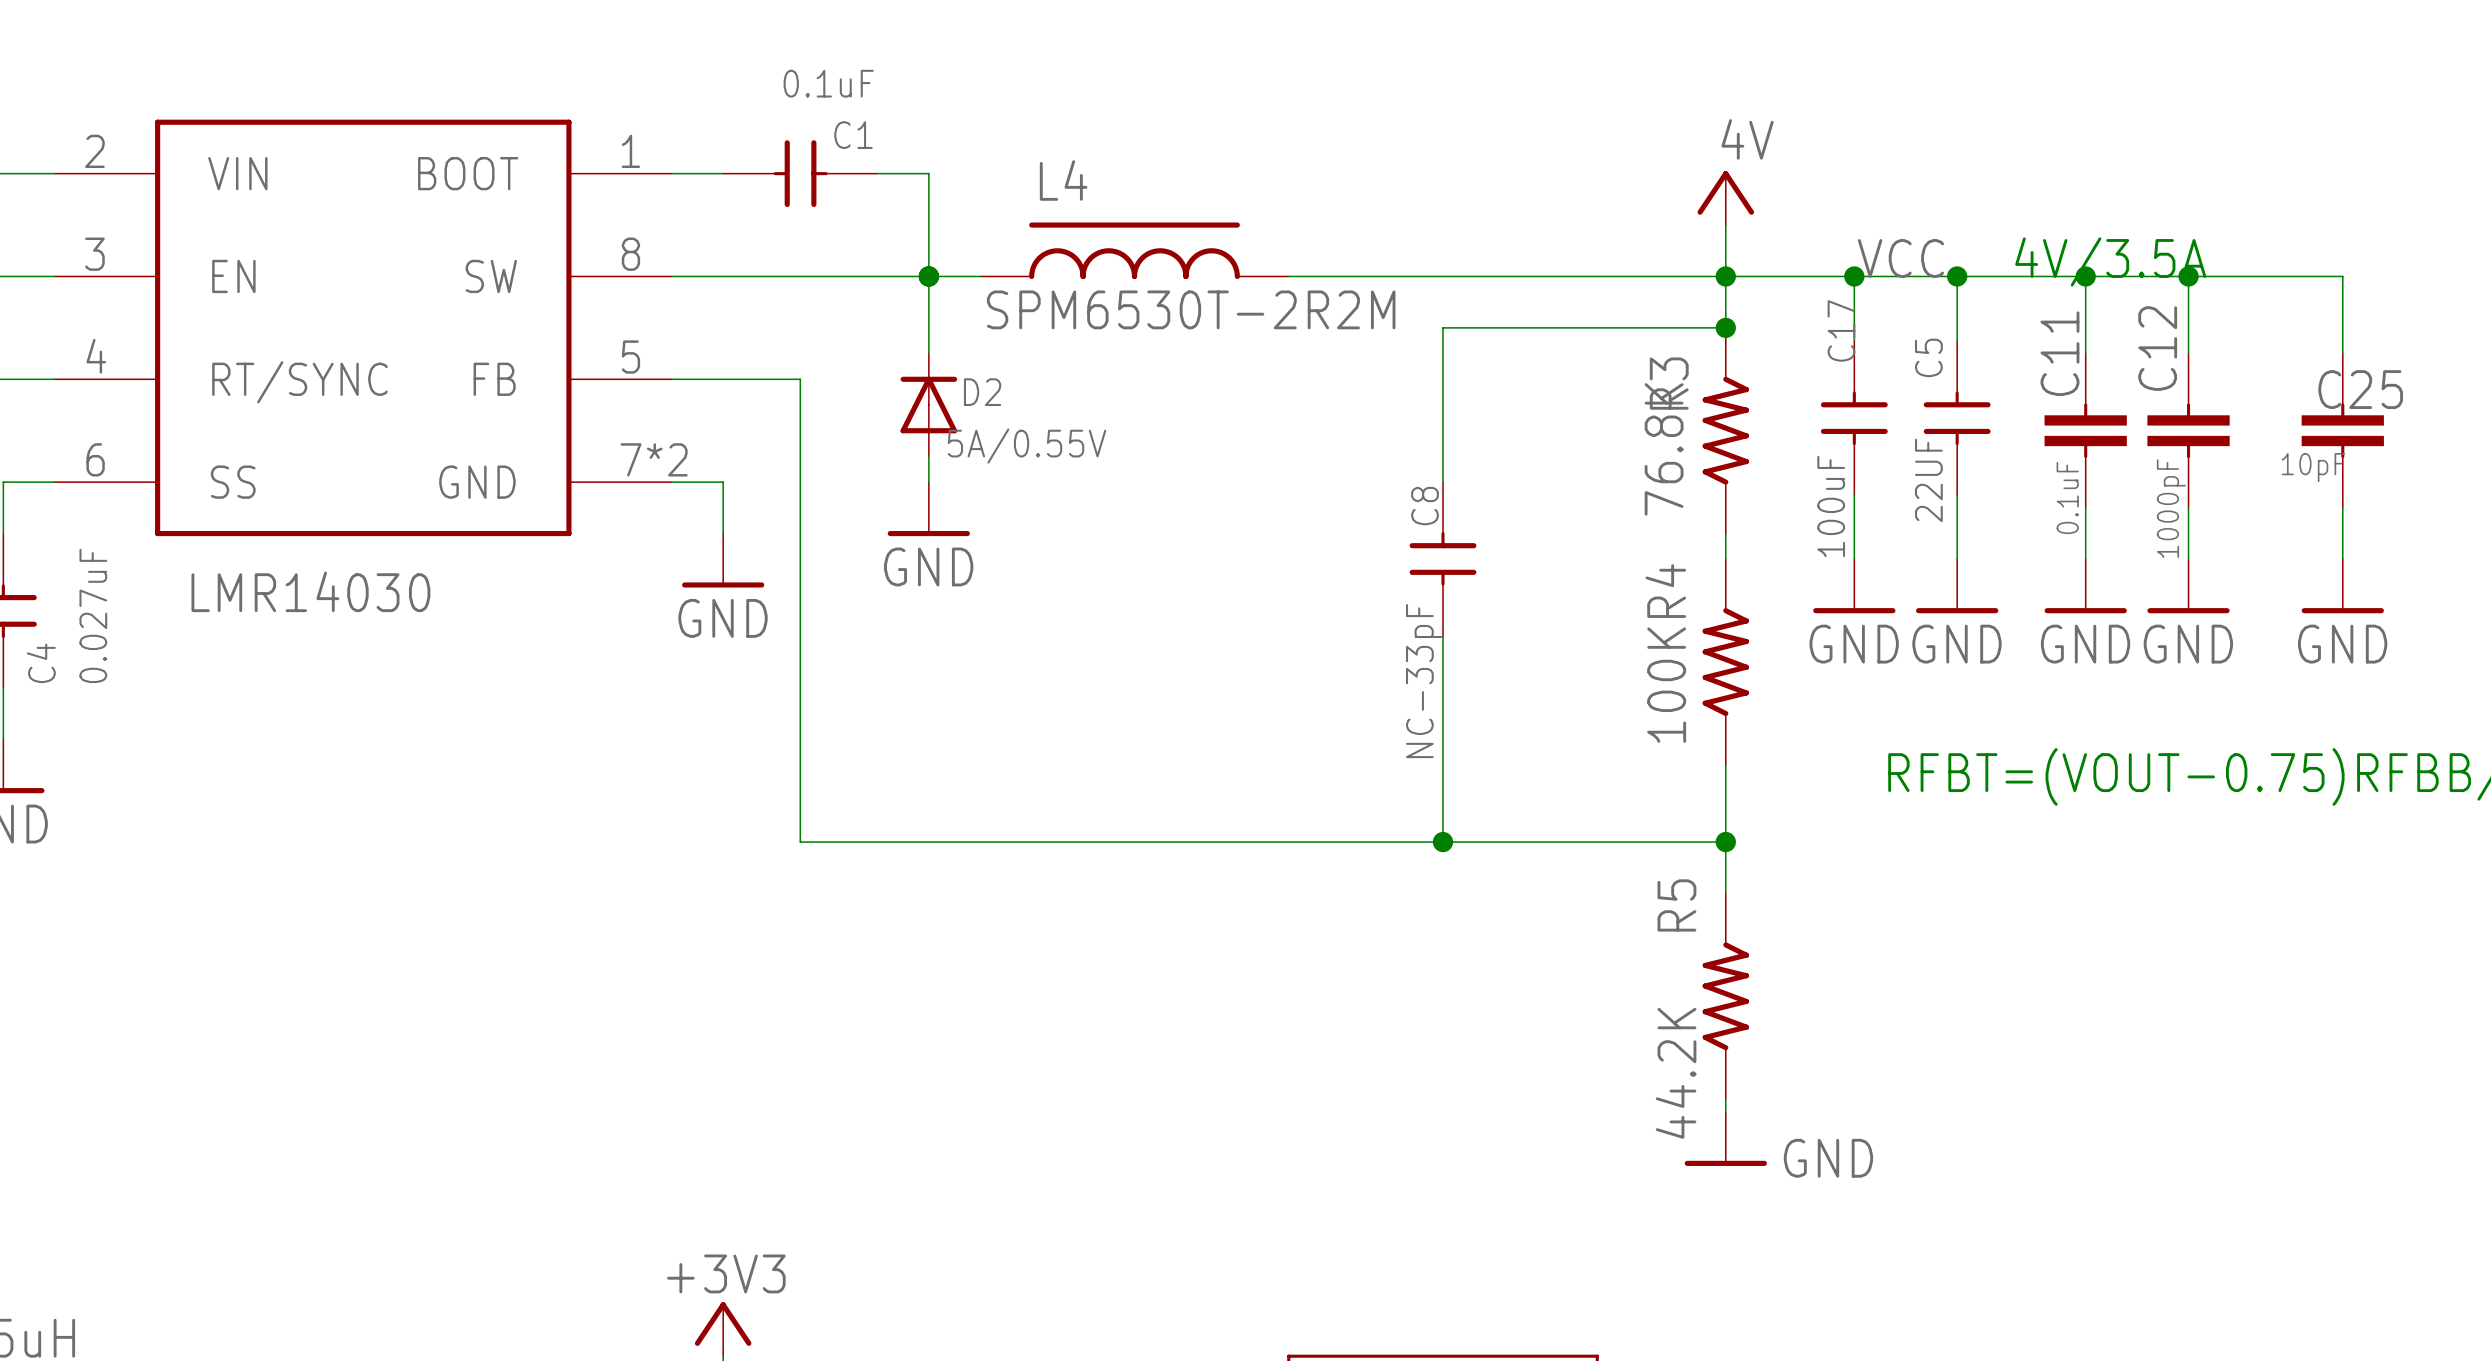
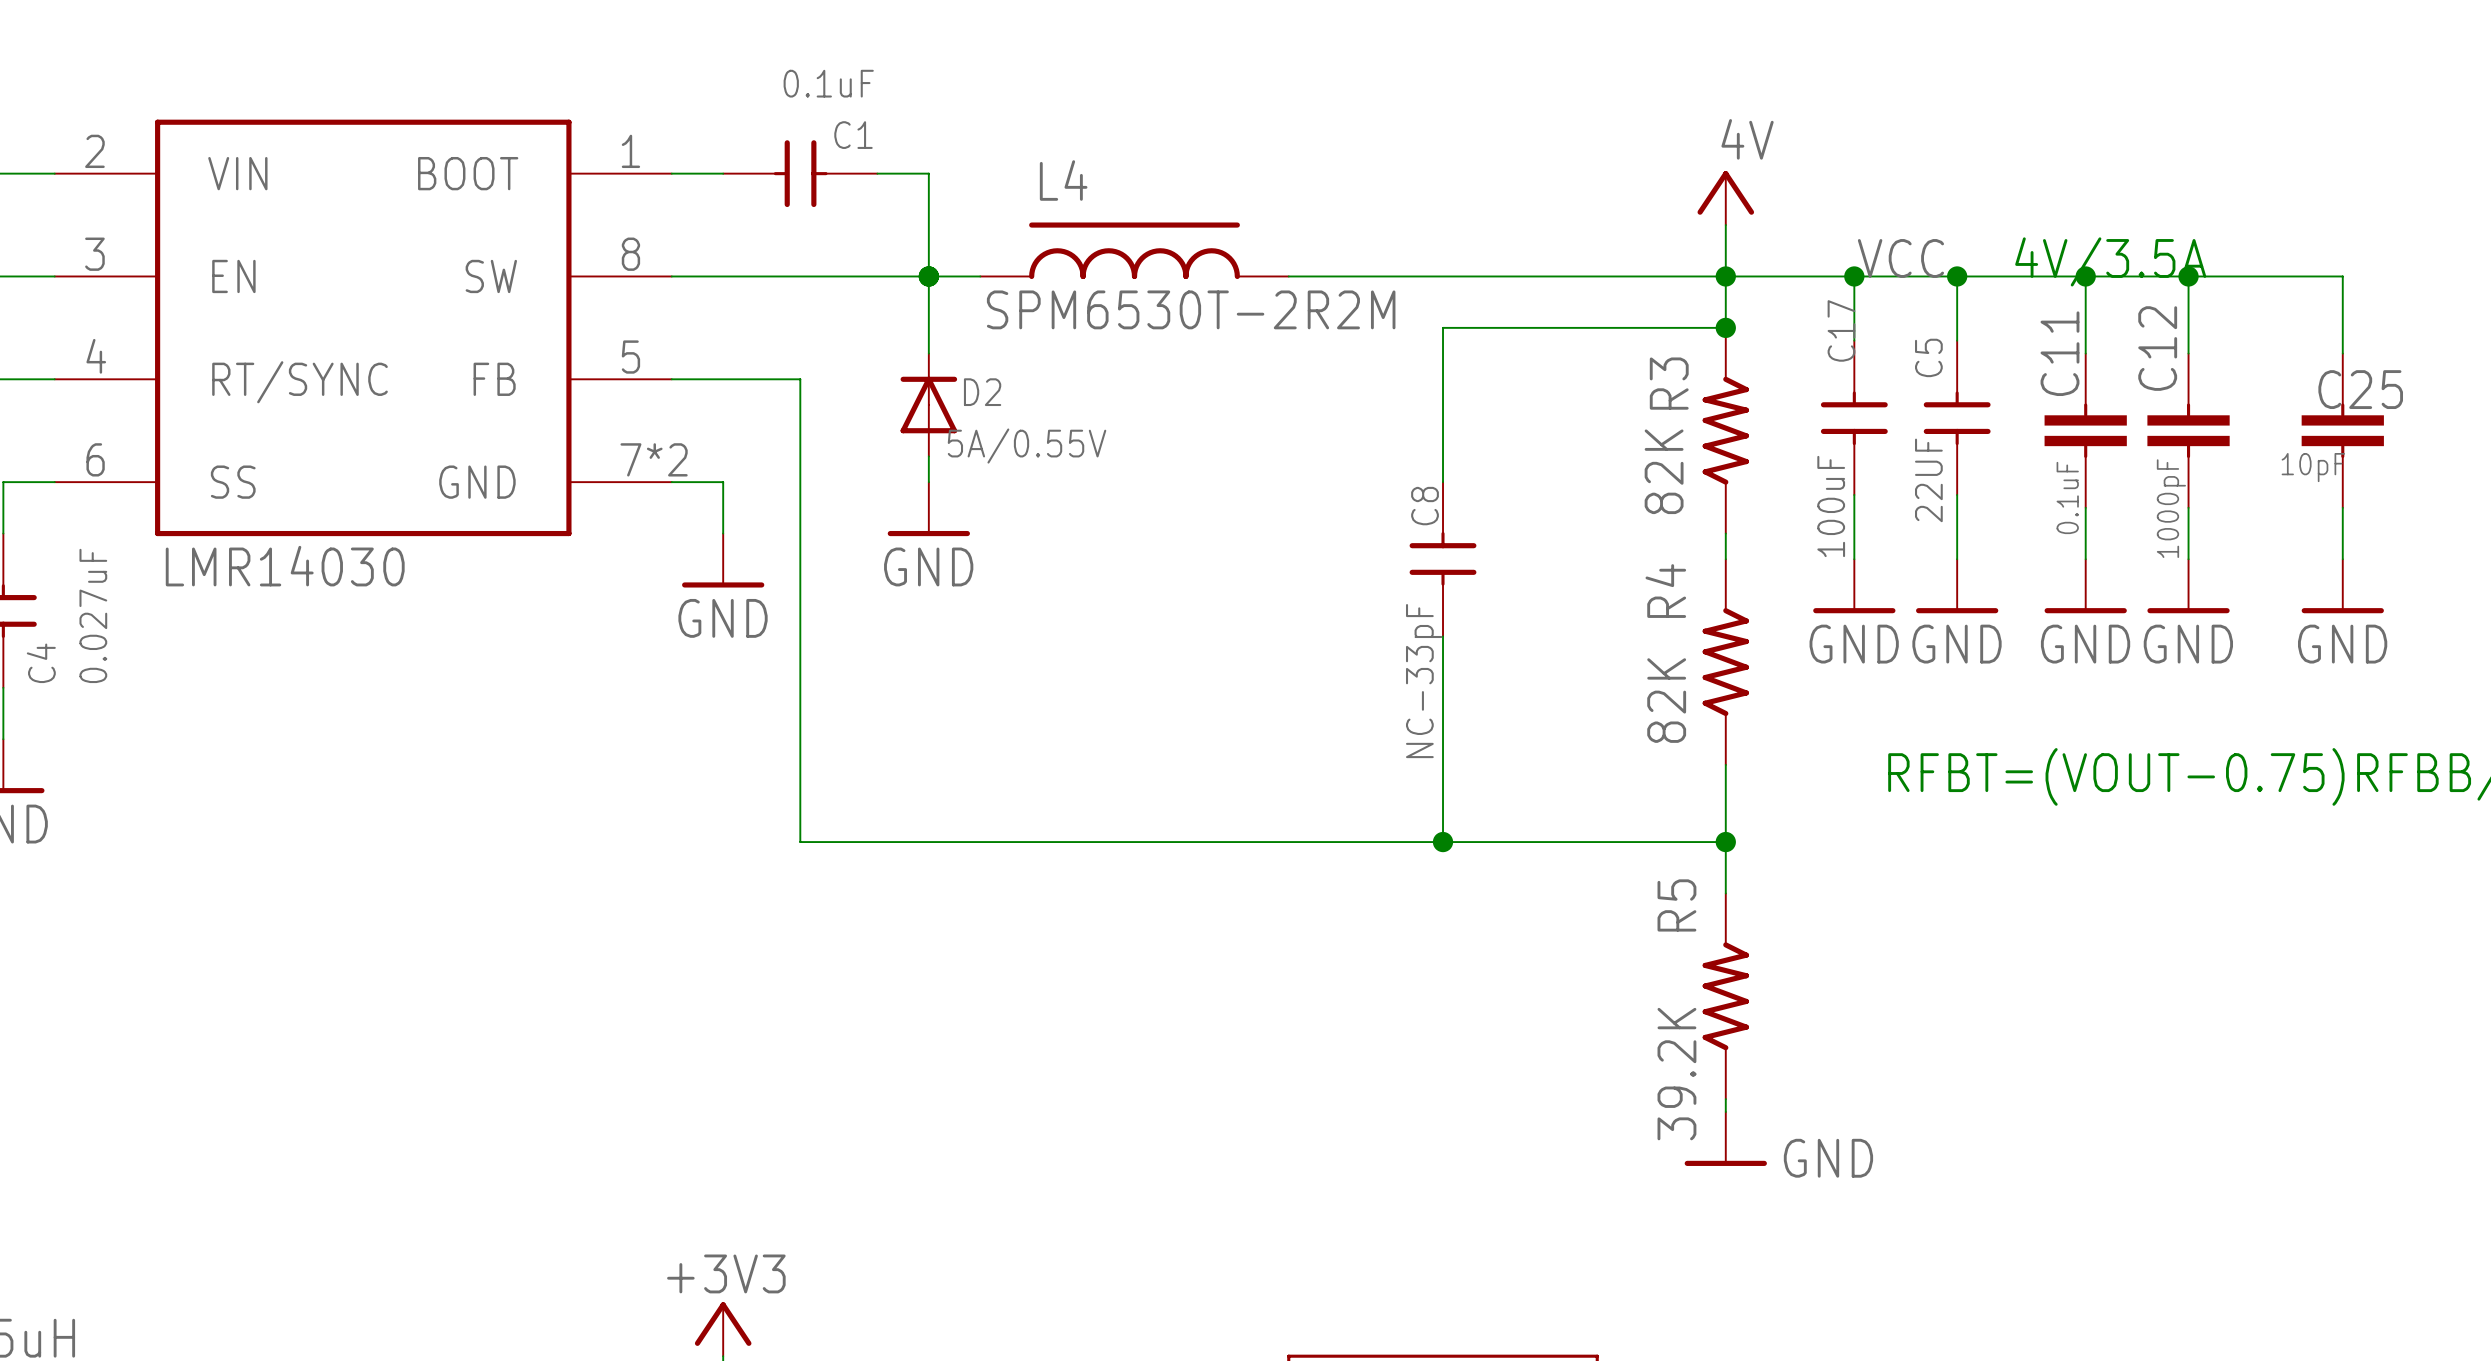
R3 value: 76.8K (1664, 449) -> 82K (1664, 471)
part value position: LMR14030 (310, 591) -> LMR14030 (285, 566)
R4 value: 100K (1666, 685) -> 82K (1666, 700)
R5 value: 44.2K (1676, 1073) -> 39.2K (1676, 1074)

